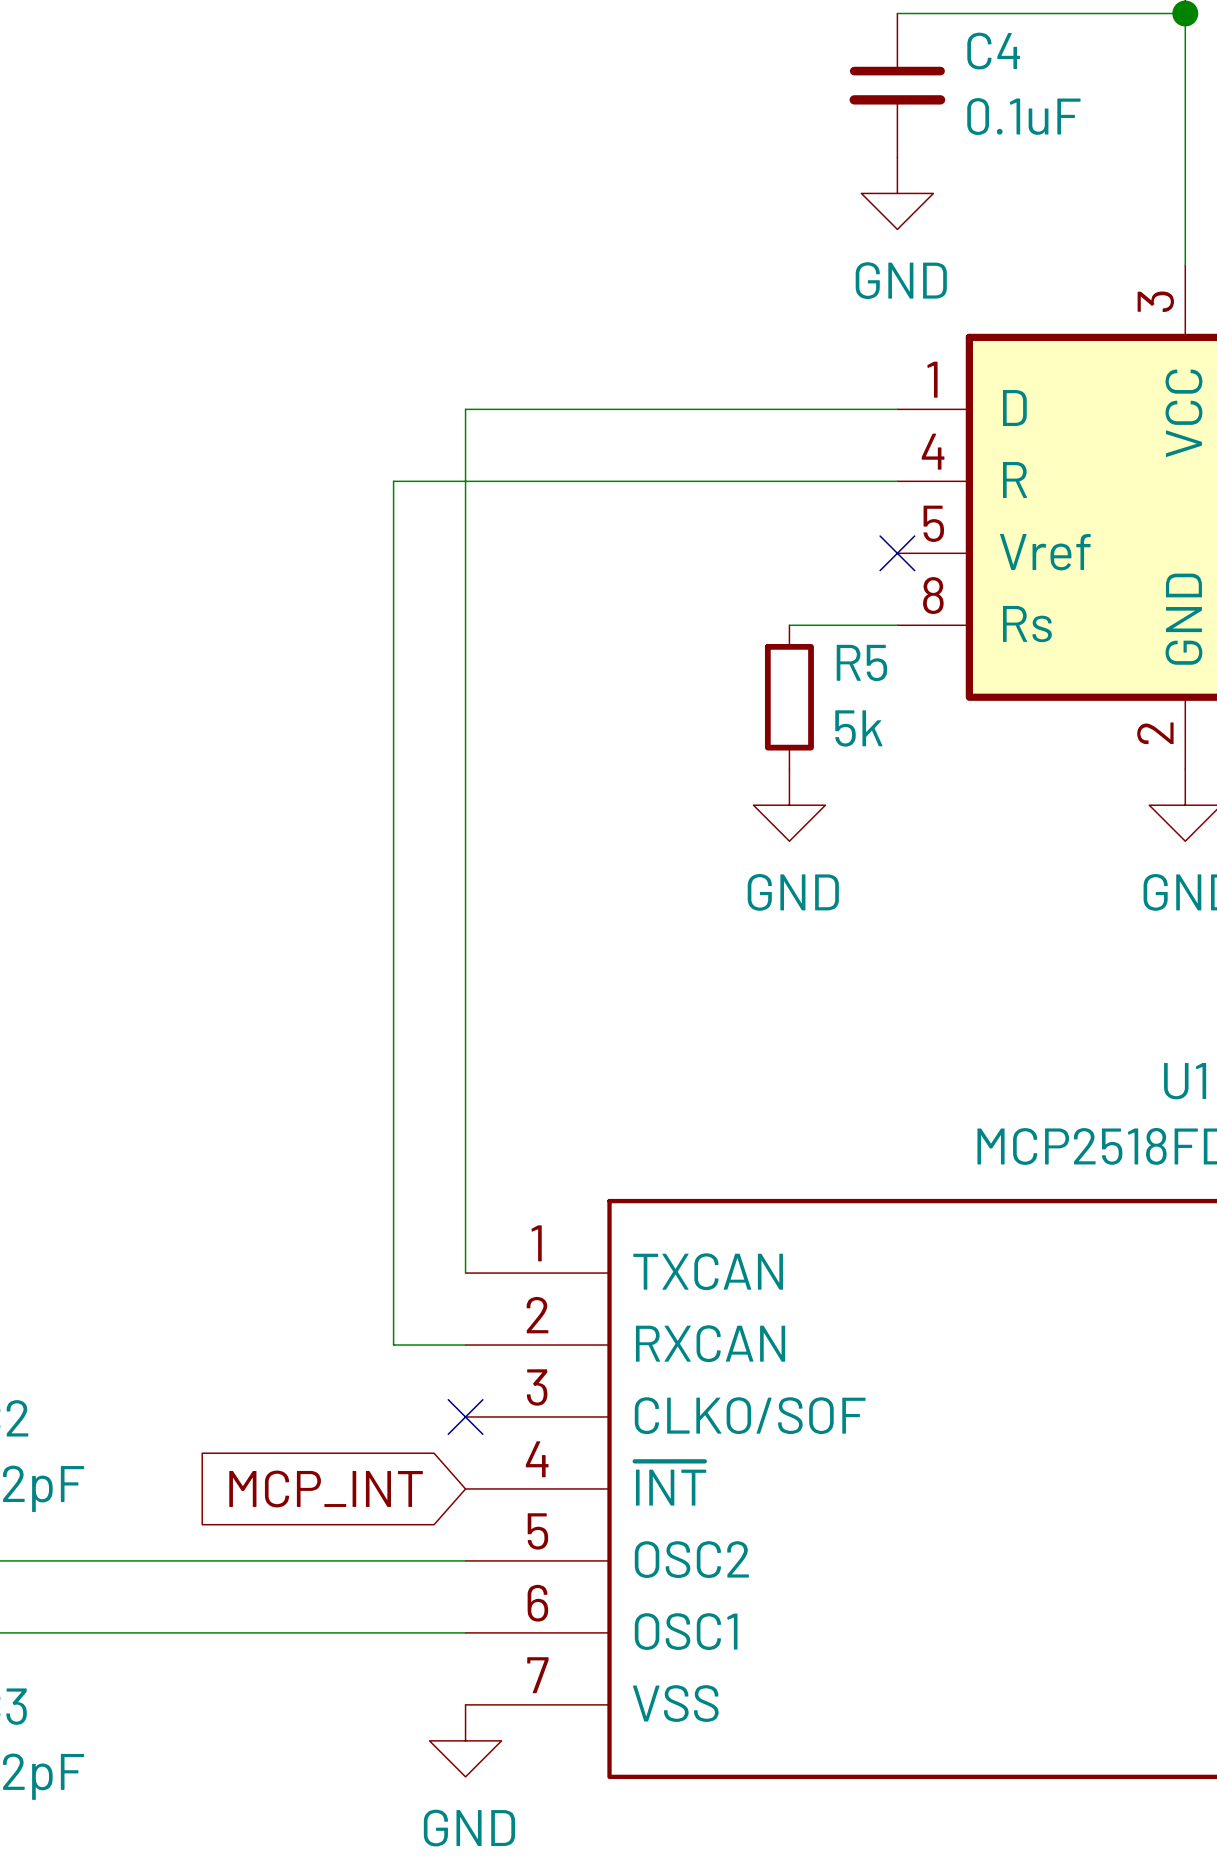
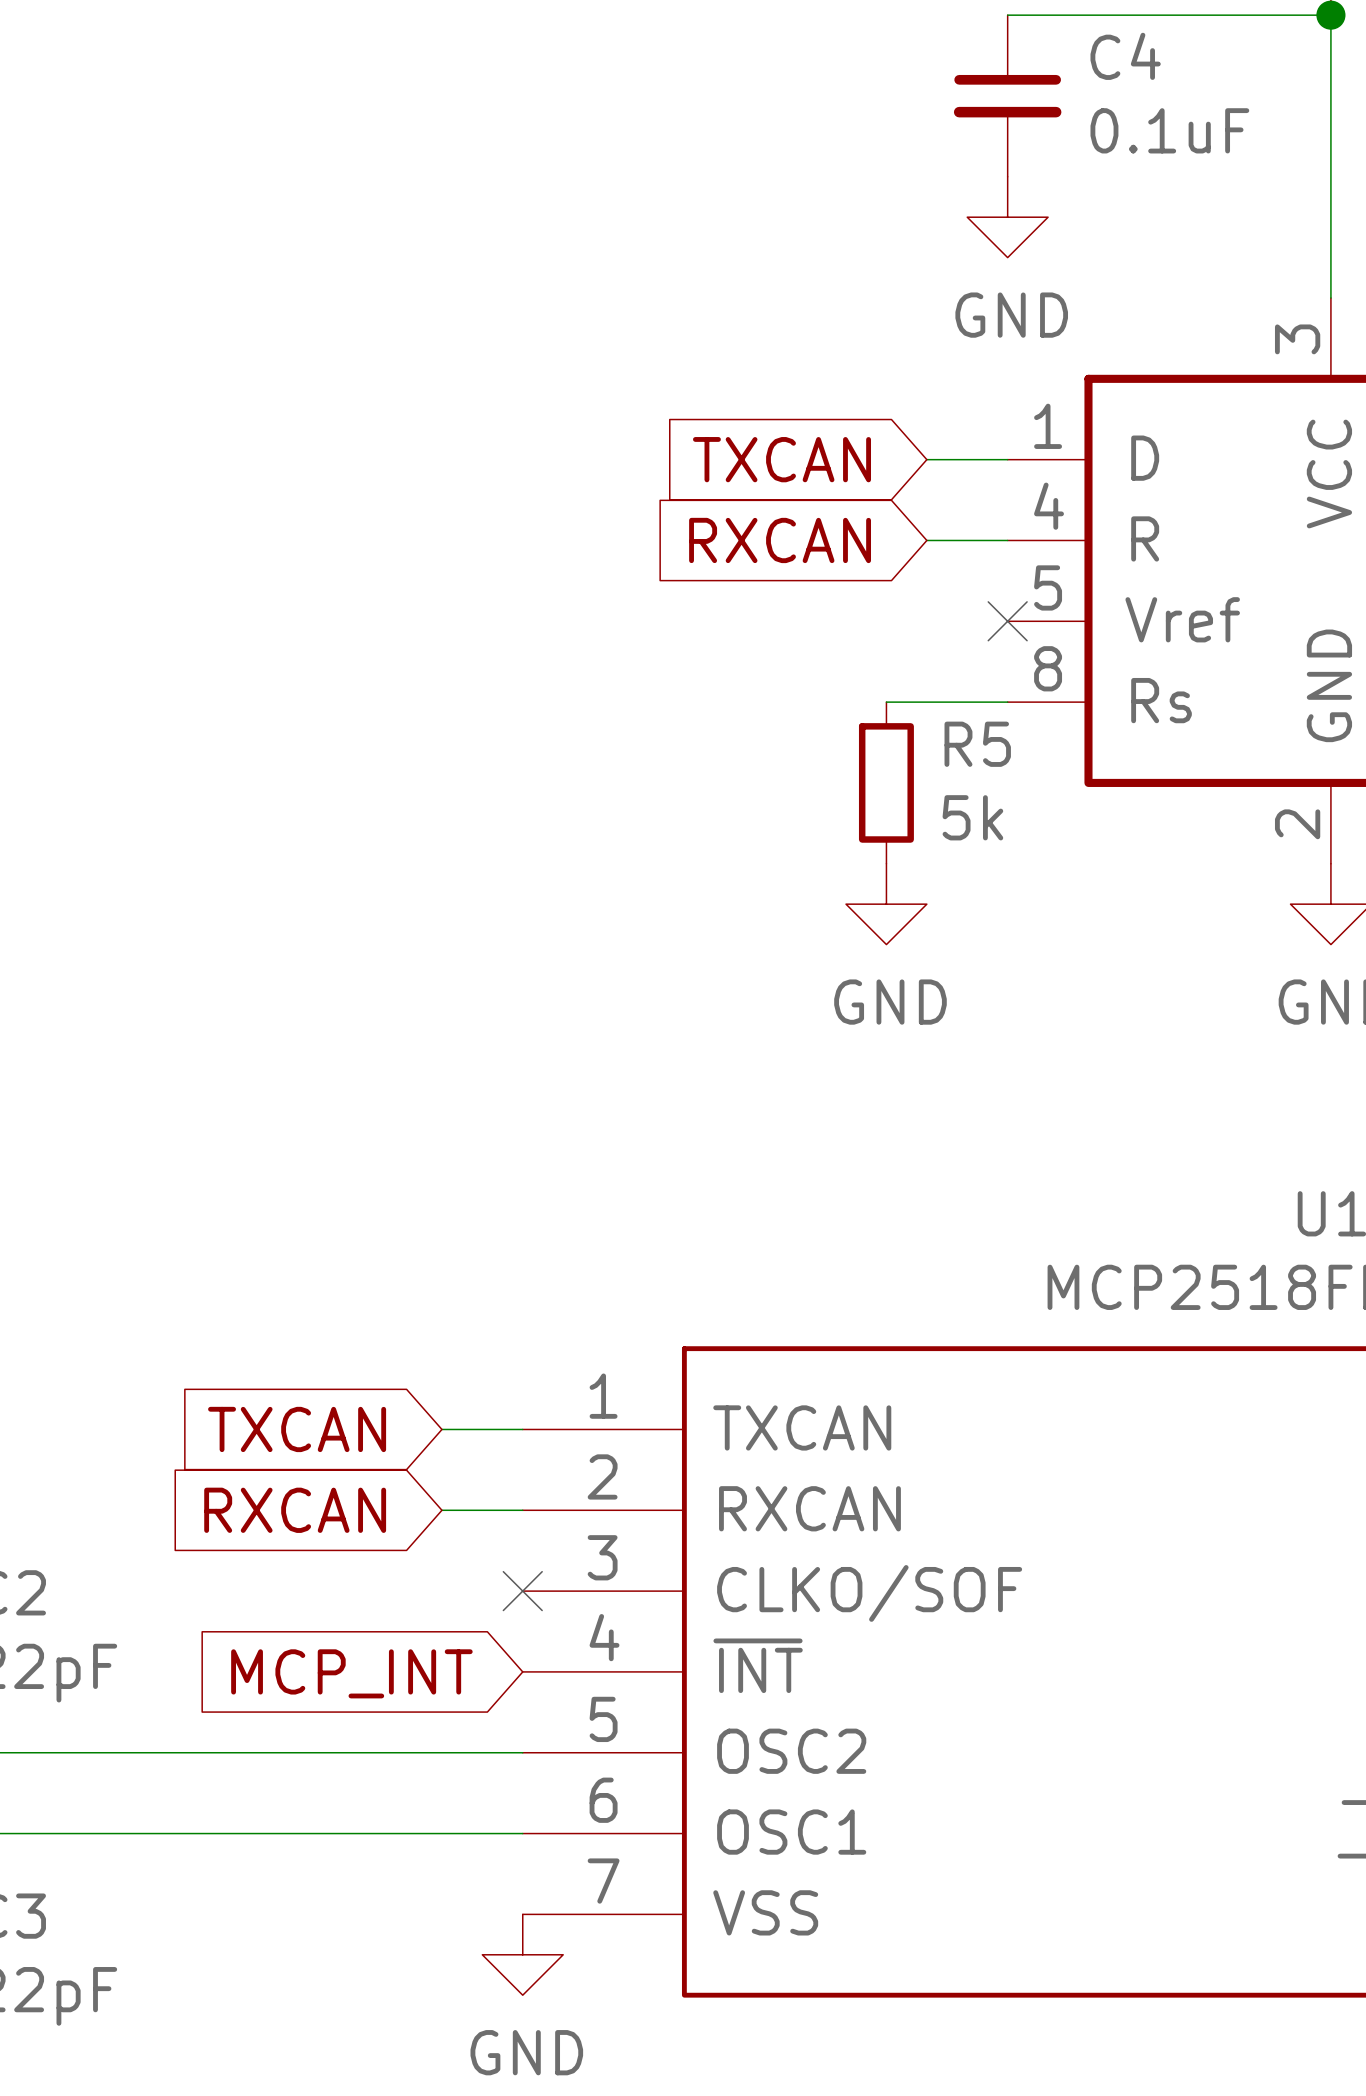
global label: none -> TXCAN (781, 459)
wire: (825, 409) (465, 409) (465, 1273) -> (441, 1429) (522, 1429)
global label: none -> RXCAN (780, 540)
wire: (825, 481) (393, 481) (393, 1345) -> none
global label: none -> TXCAN (297, 1429)
global label: none -> RXCAN (295, 1510)

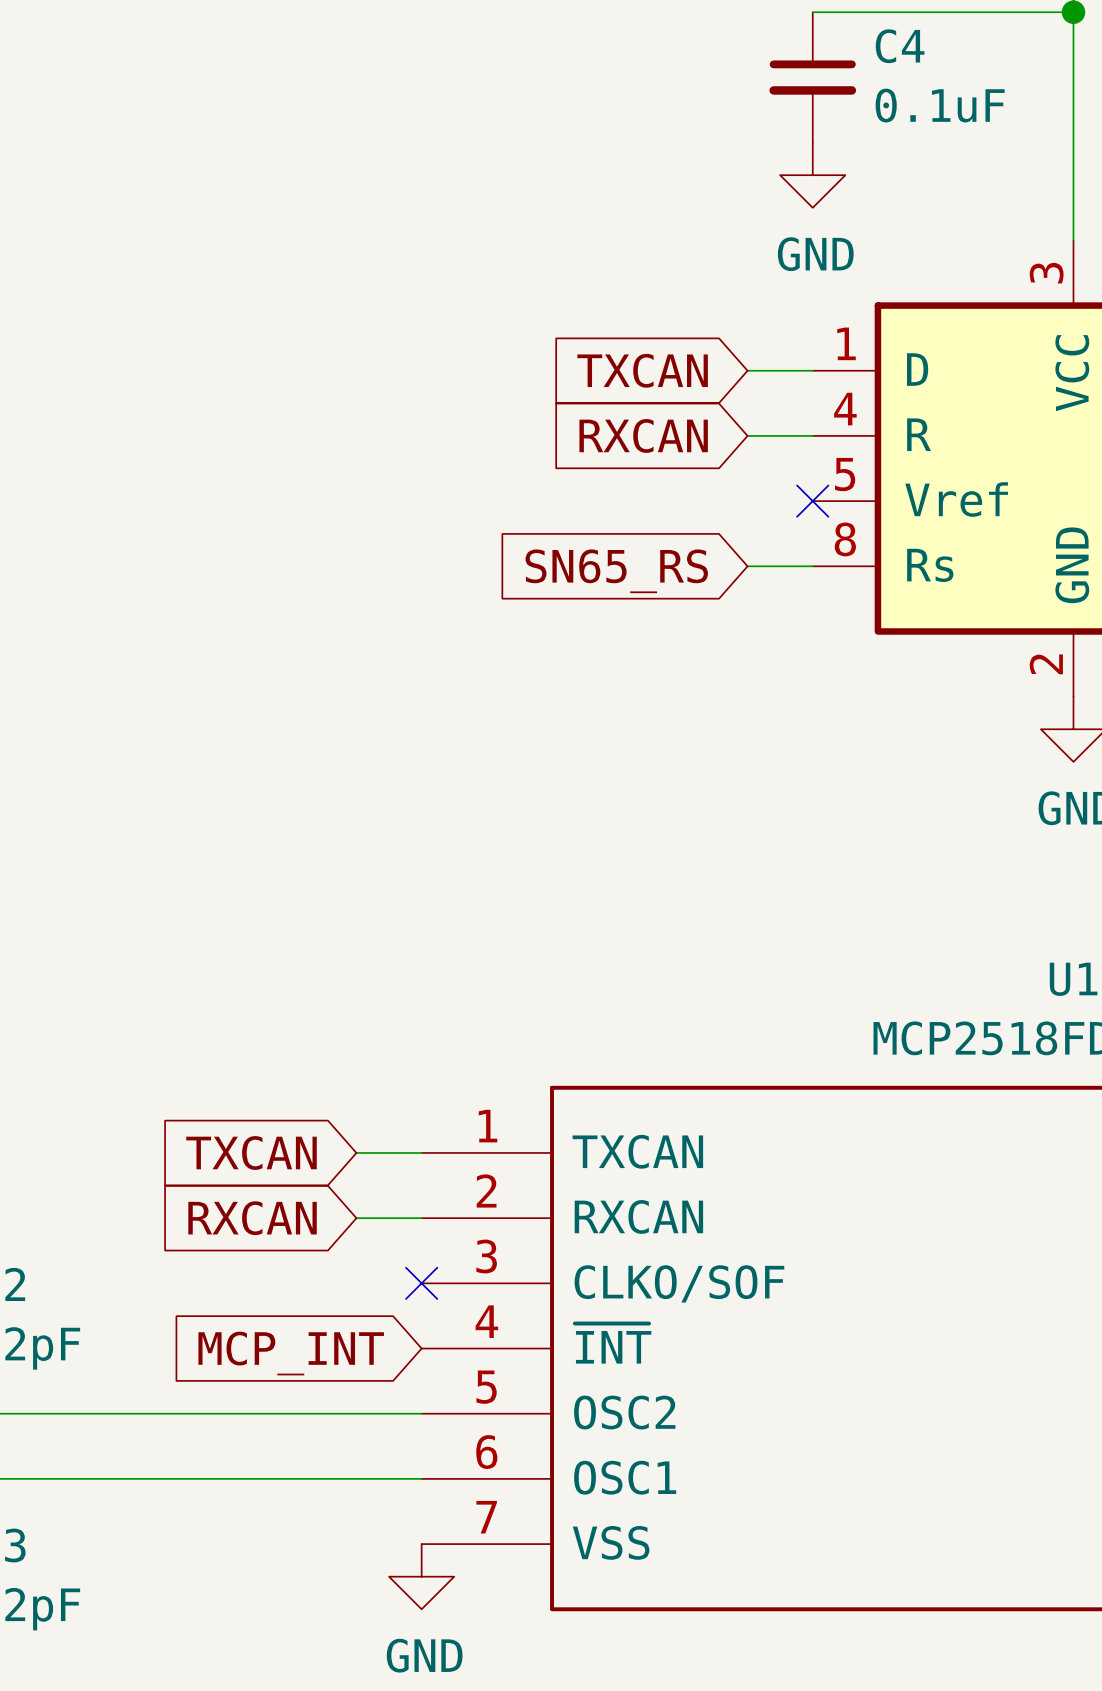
wire: (886, 702) (926, 702) -> none
global label: none -> SN65_RS (616, 571)
R5: 5k (886, 782) -> none
power symbol: GND (886, 904) -> none

